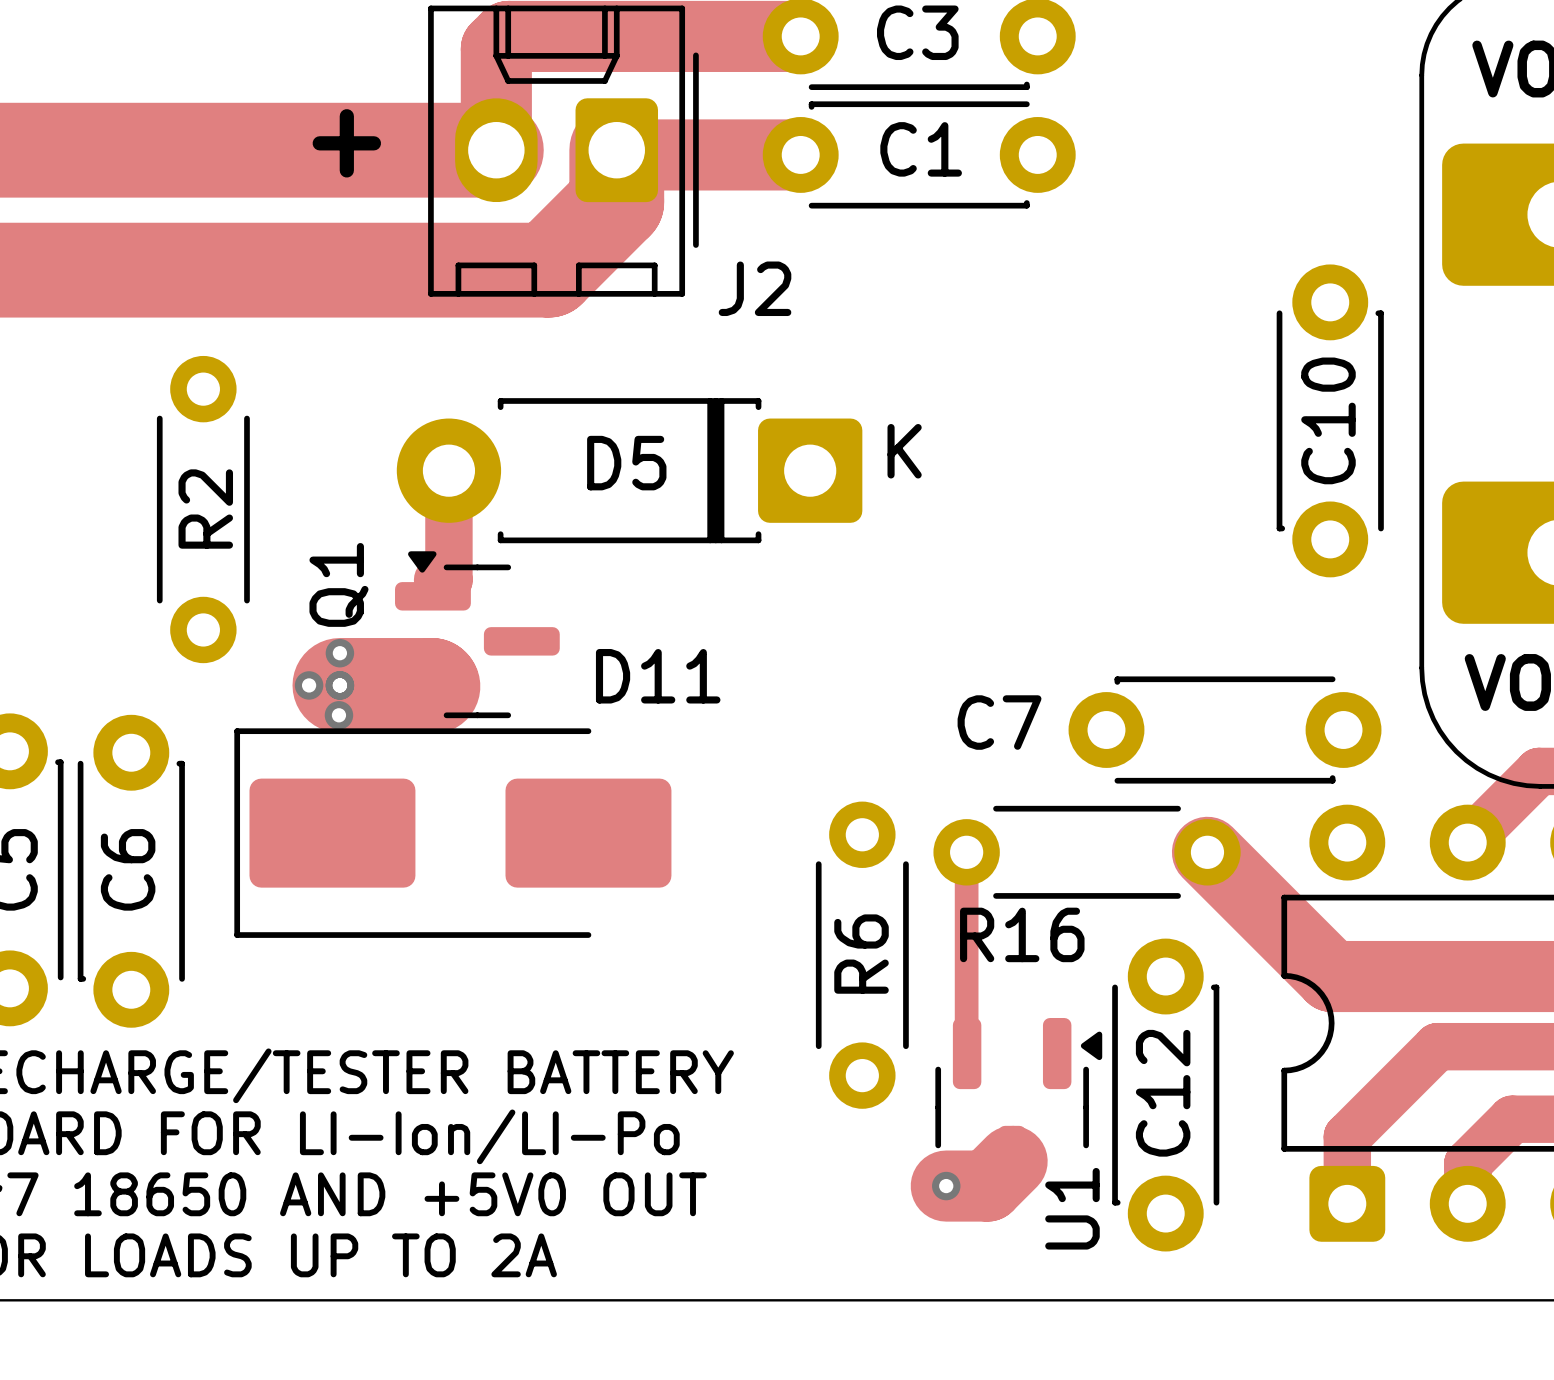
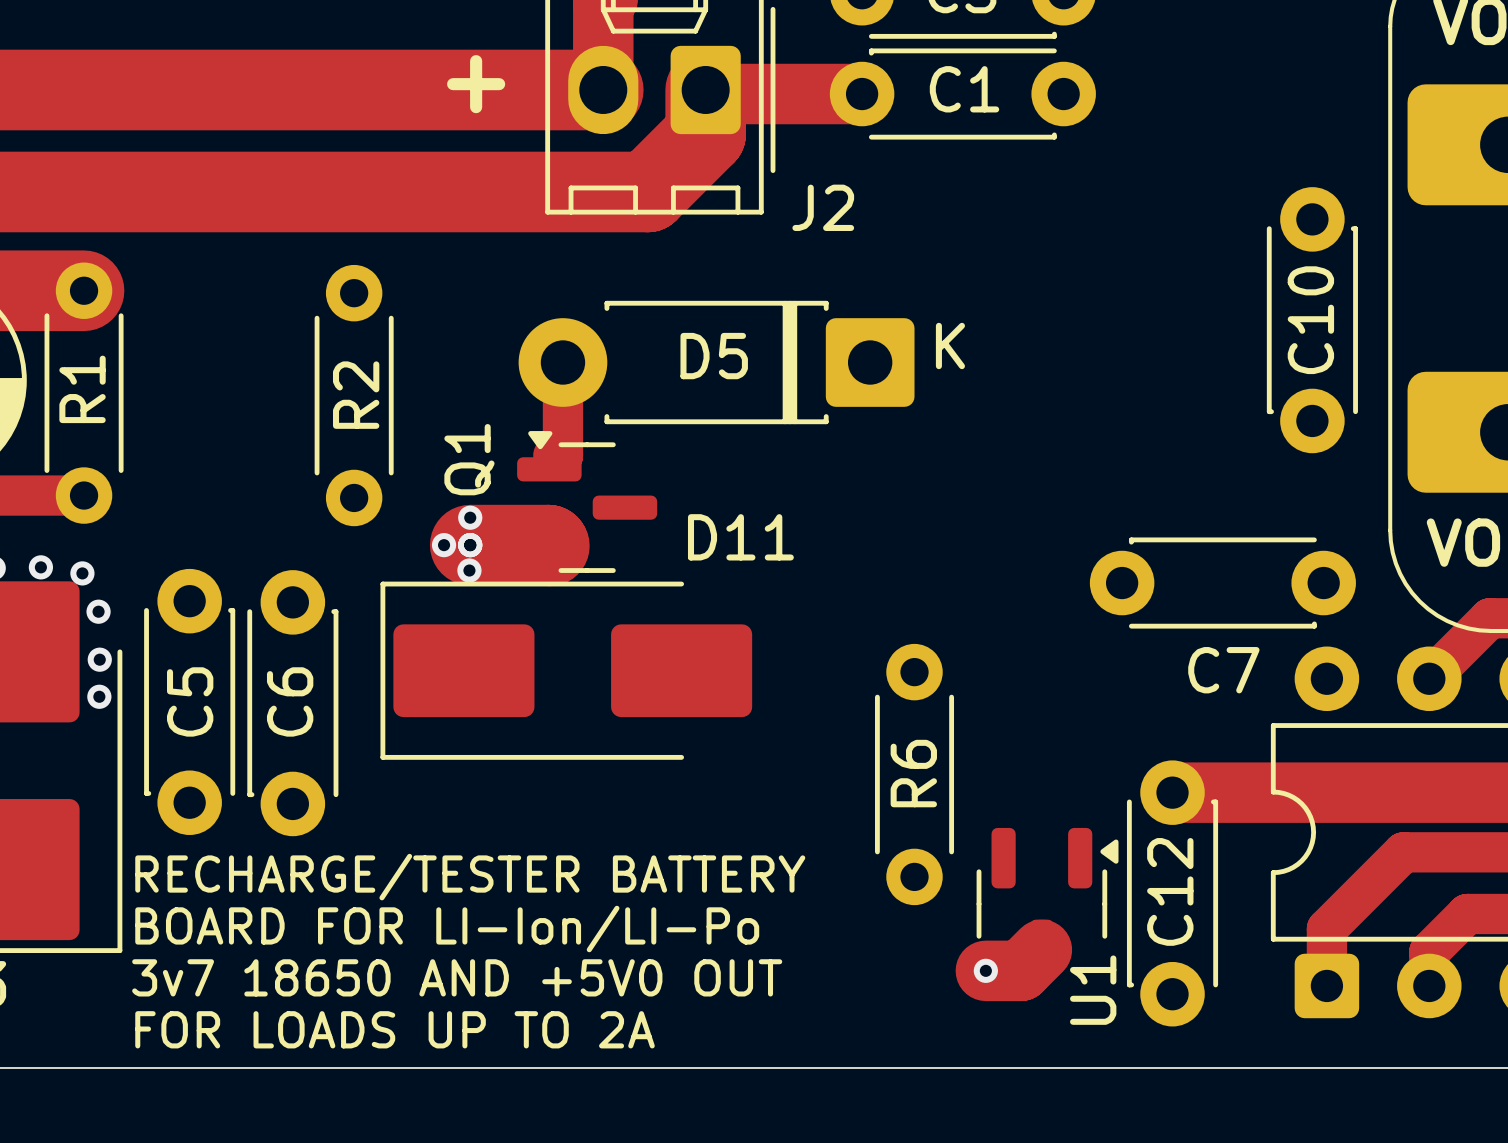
C7 name position: C7 (999, 722) -> C7 (1223, 670)
track: (966, 852) (966, 1053) -> none
R16: (1087, 852) -> none
track: (1207, 852) (1331, 976) -> (1172, 792) (1313, 792)

